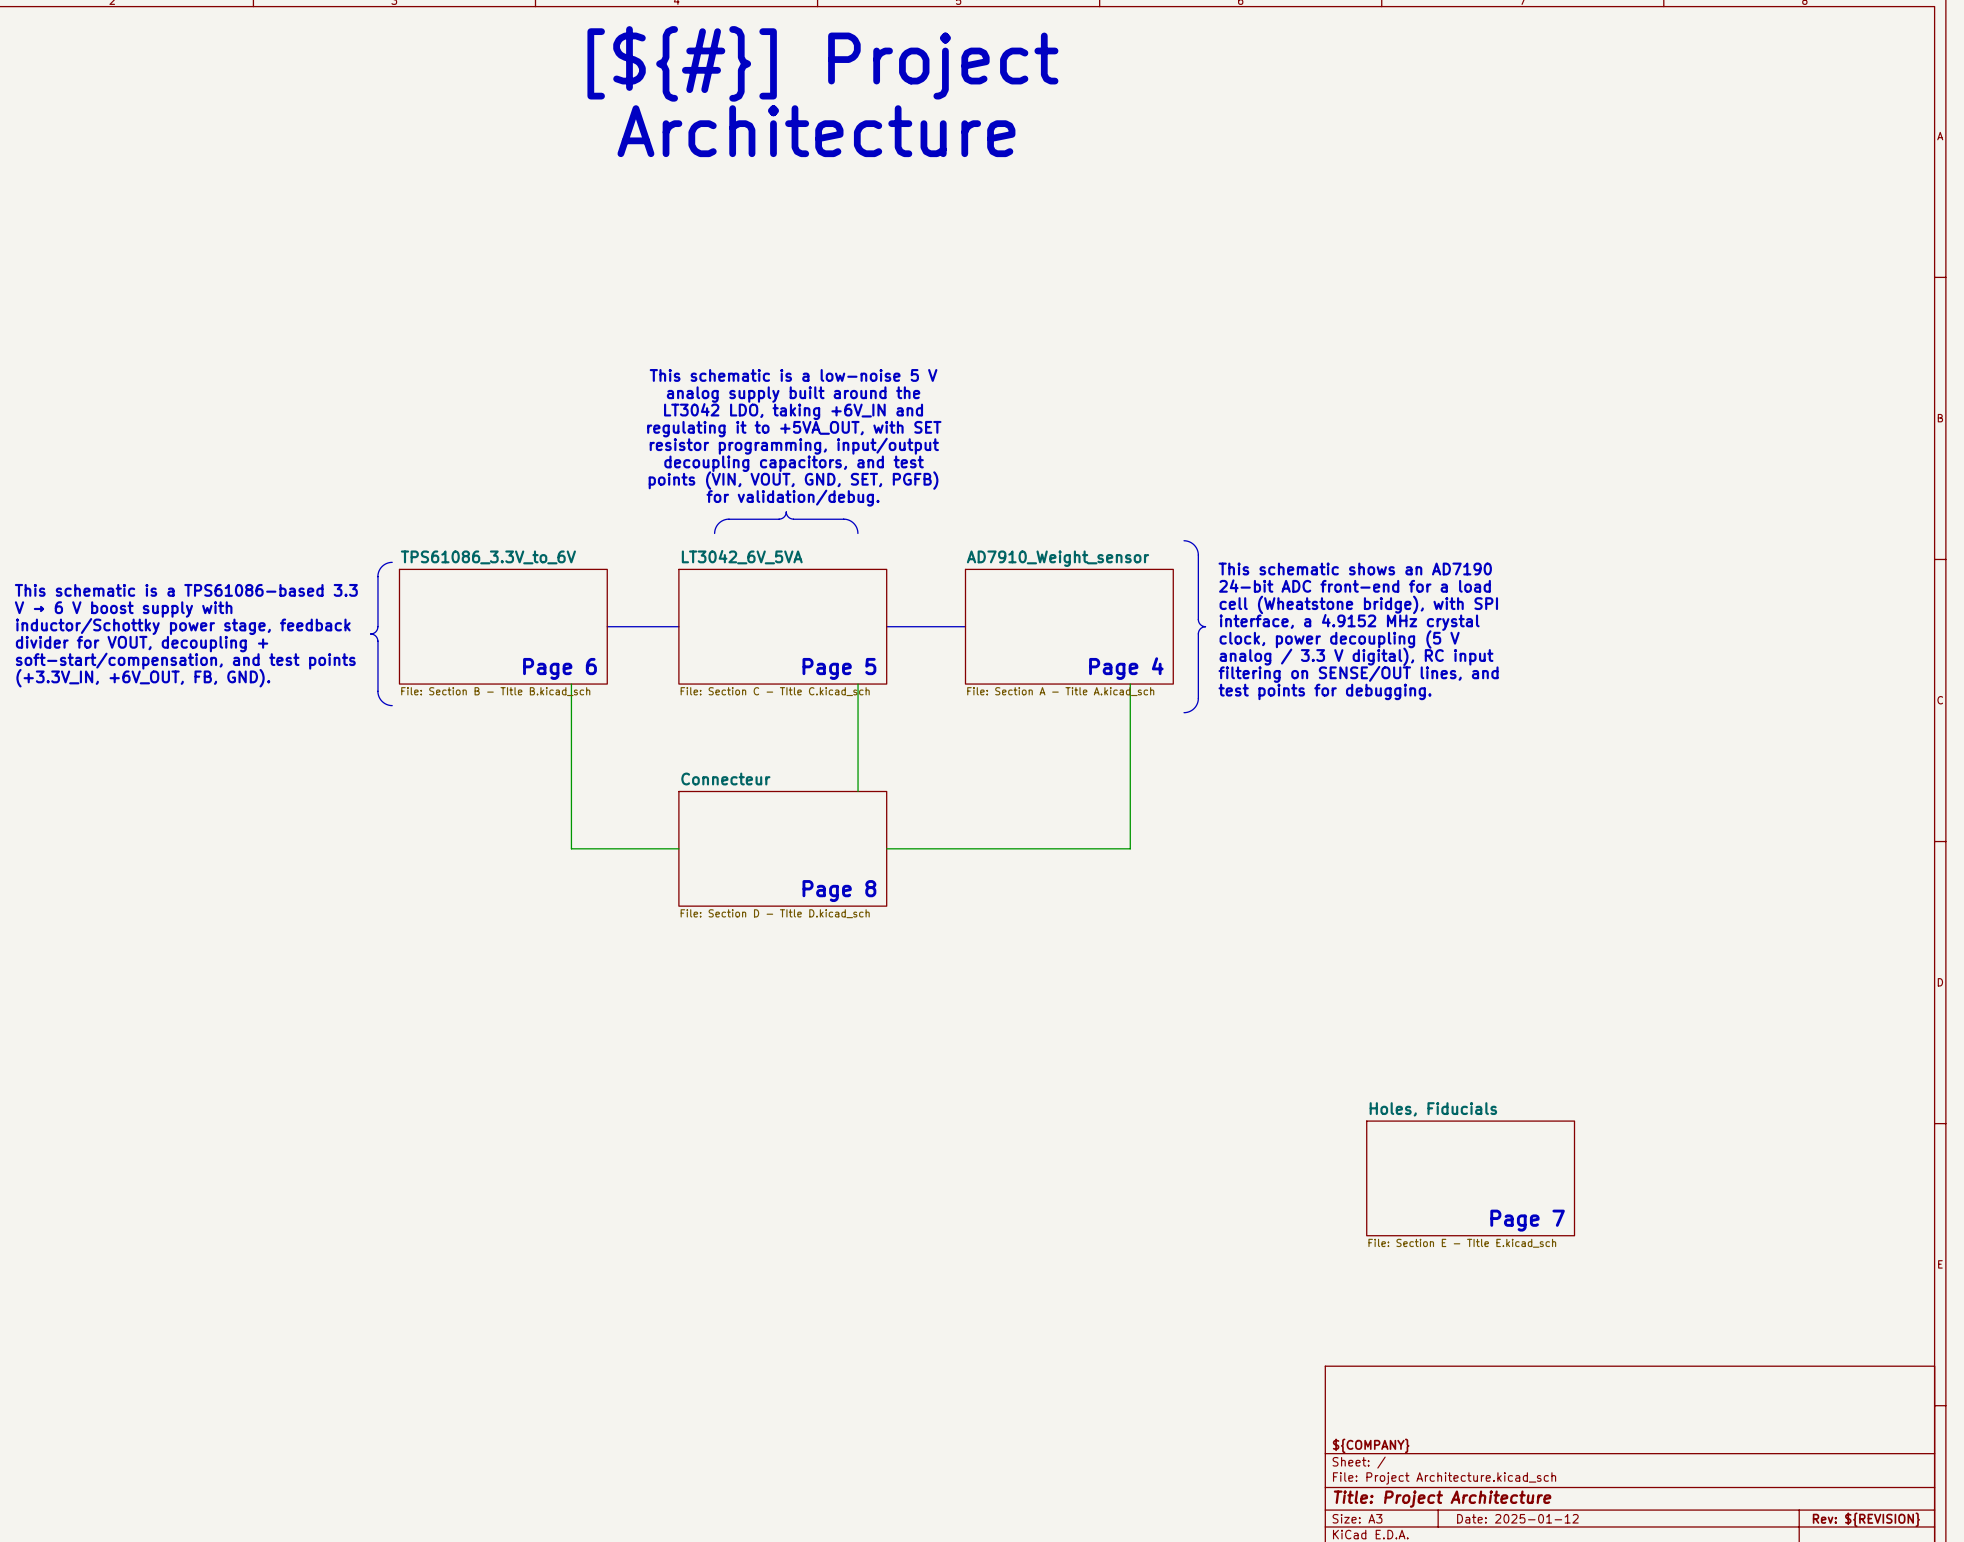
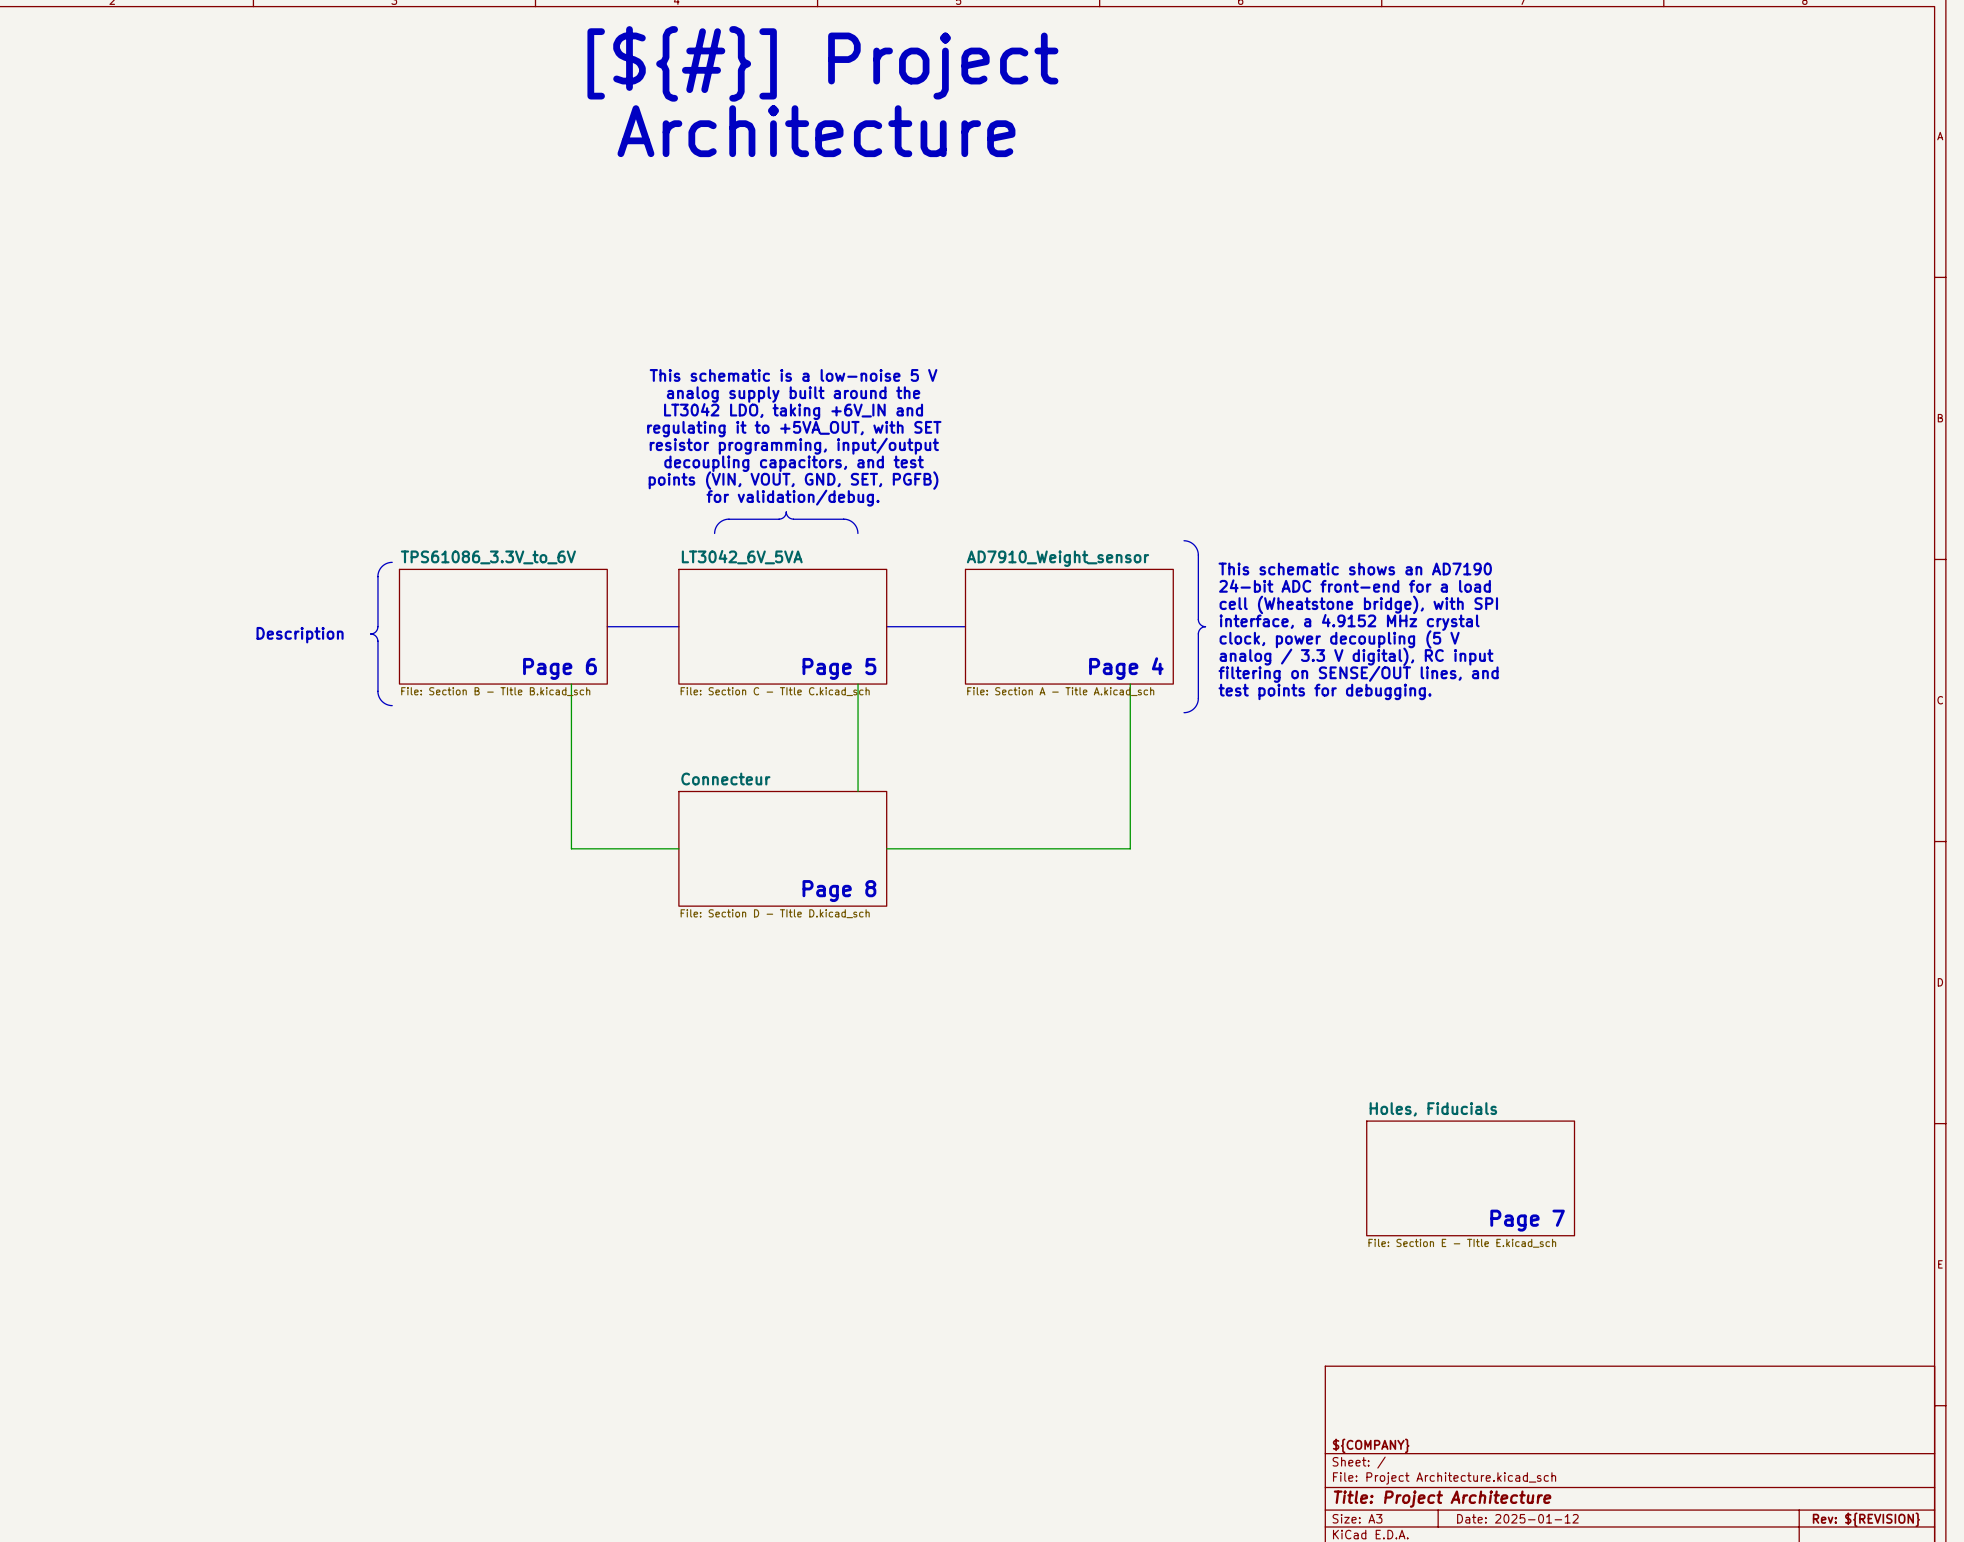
text: This schematic is a TPS61086-based 3.3 (186, 590) -> none
text: V → 6 V boost supply with (123, 609) -> none
text: inductor/Schottky power stage, feedback (183, 626) -> none
text: none -> Description (300, 635)
text: divider for VOUT, decoupling + (142, 644) -> none
text: soft-start/compensation, and test points (185, 661) -> none
text: (+3.3V_IN, +6V_OUT, FB, GND). (143, 678) -> none

